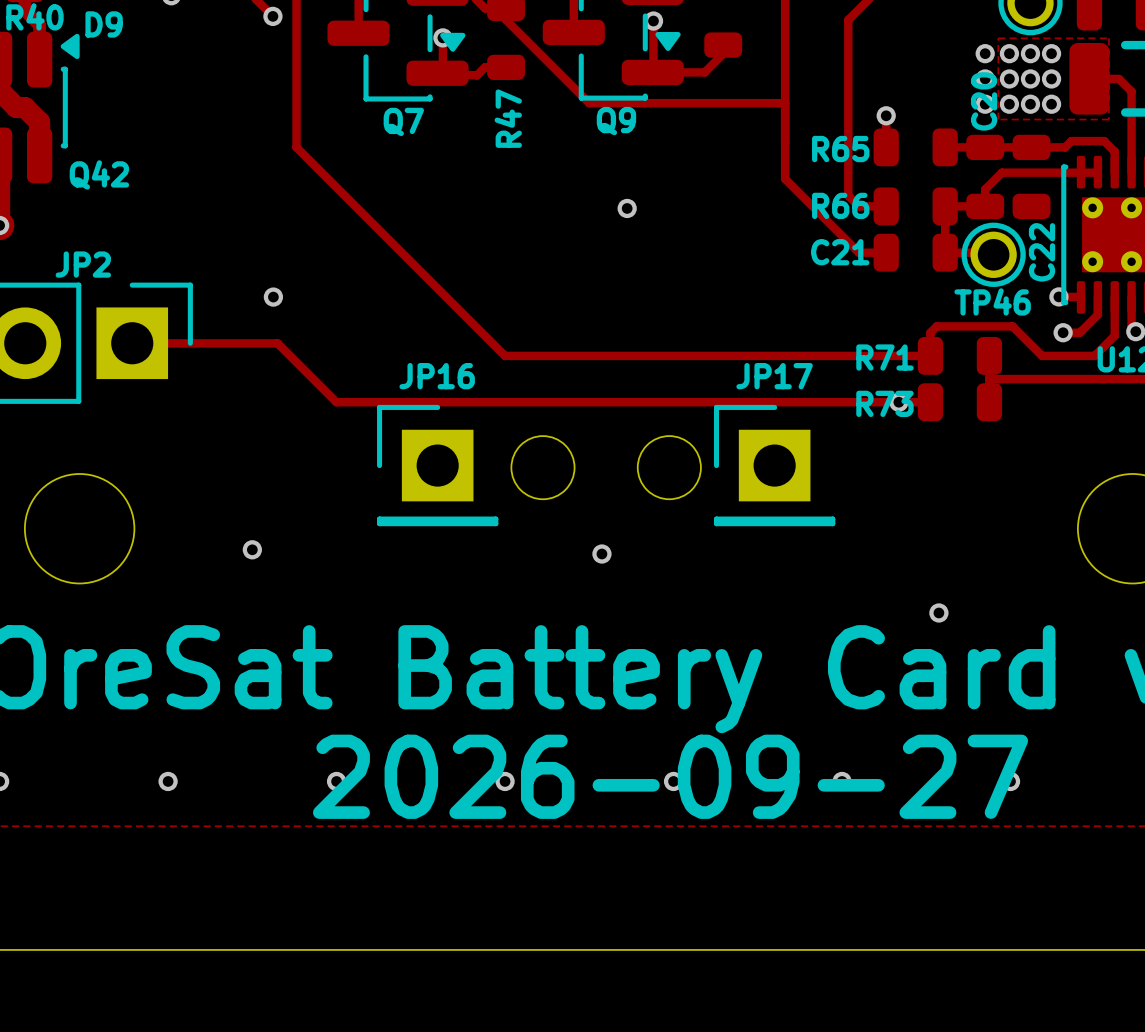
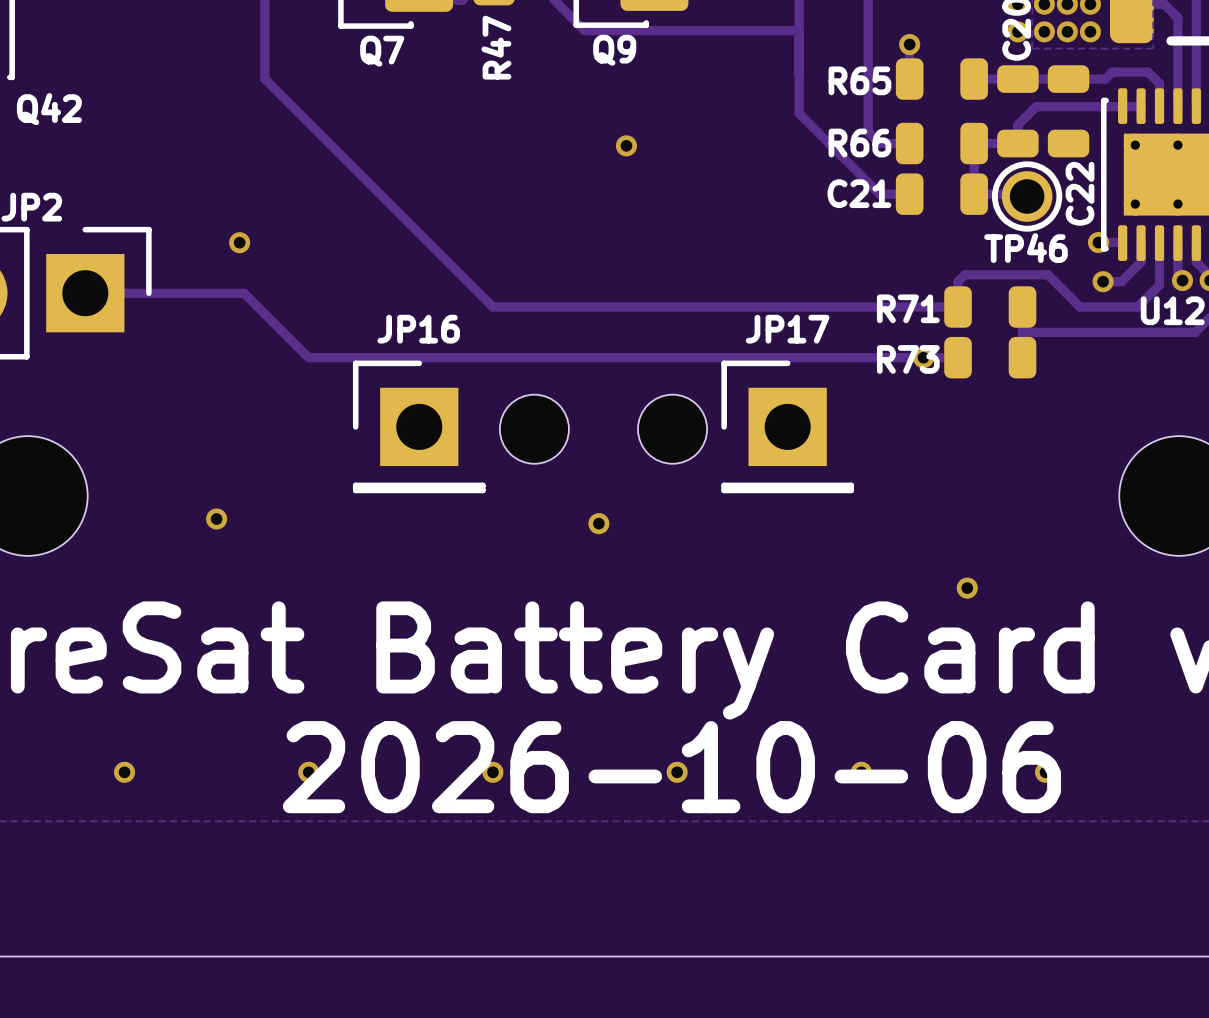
text: 2026-09-27 (670, 776) -> 2026-10-06 (671, 767)

